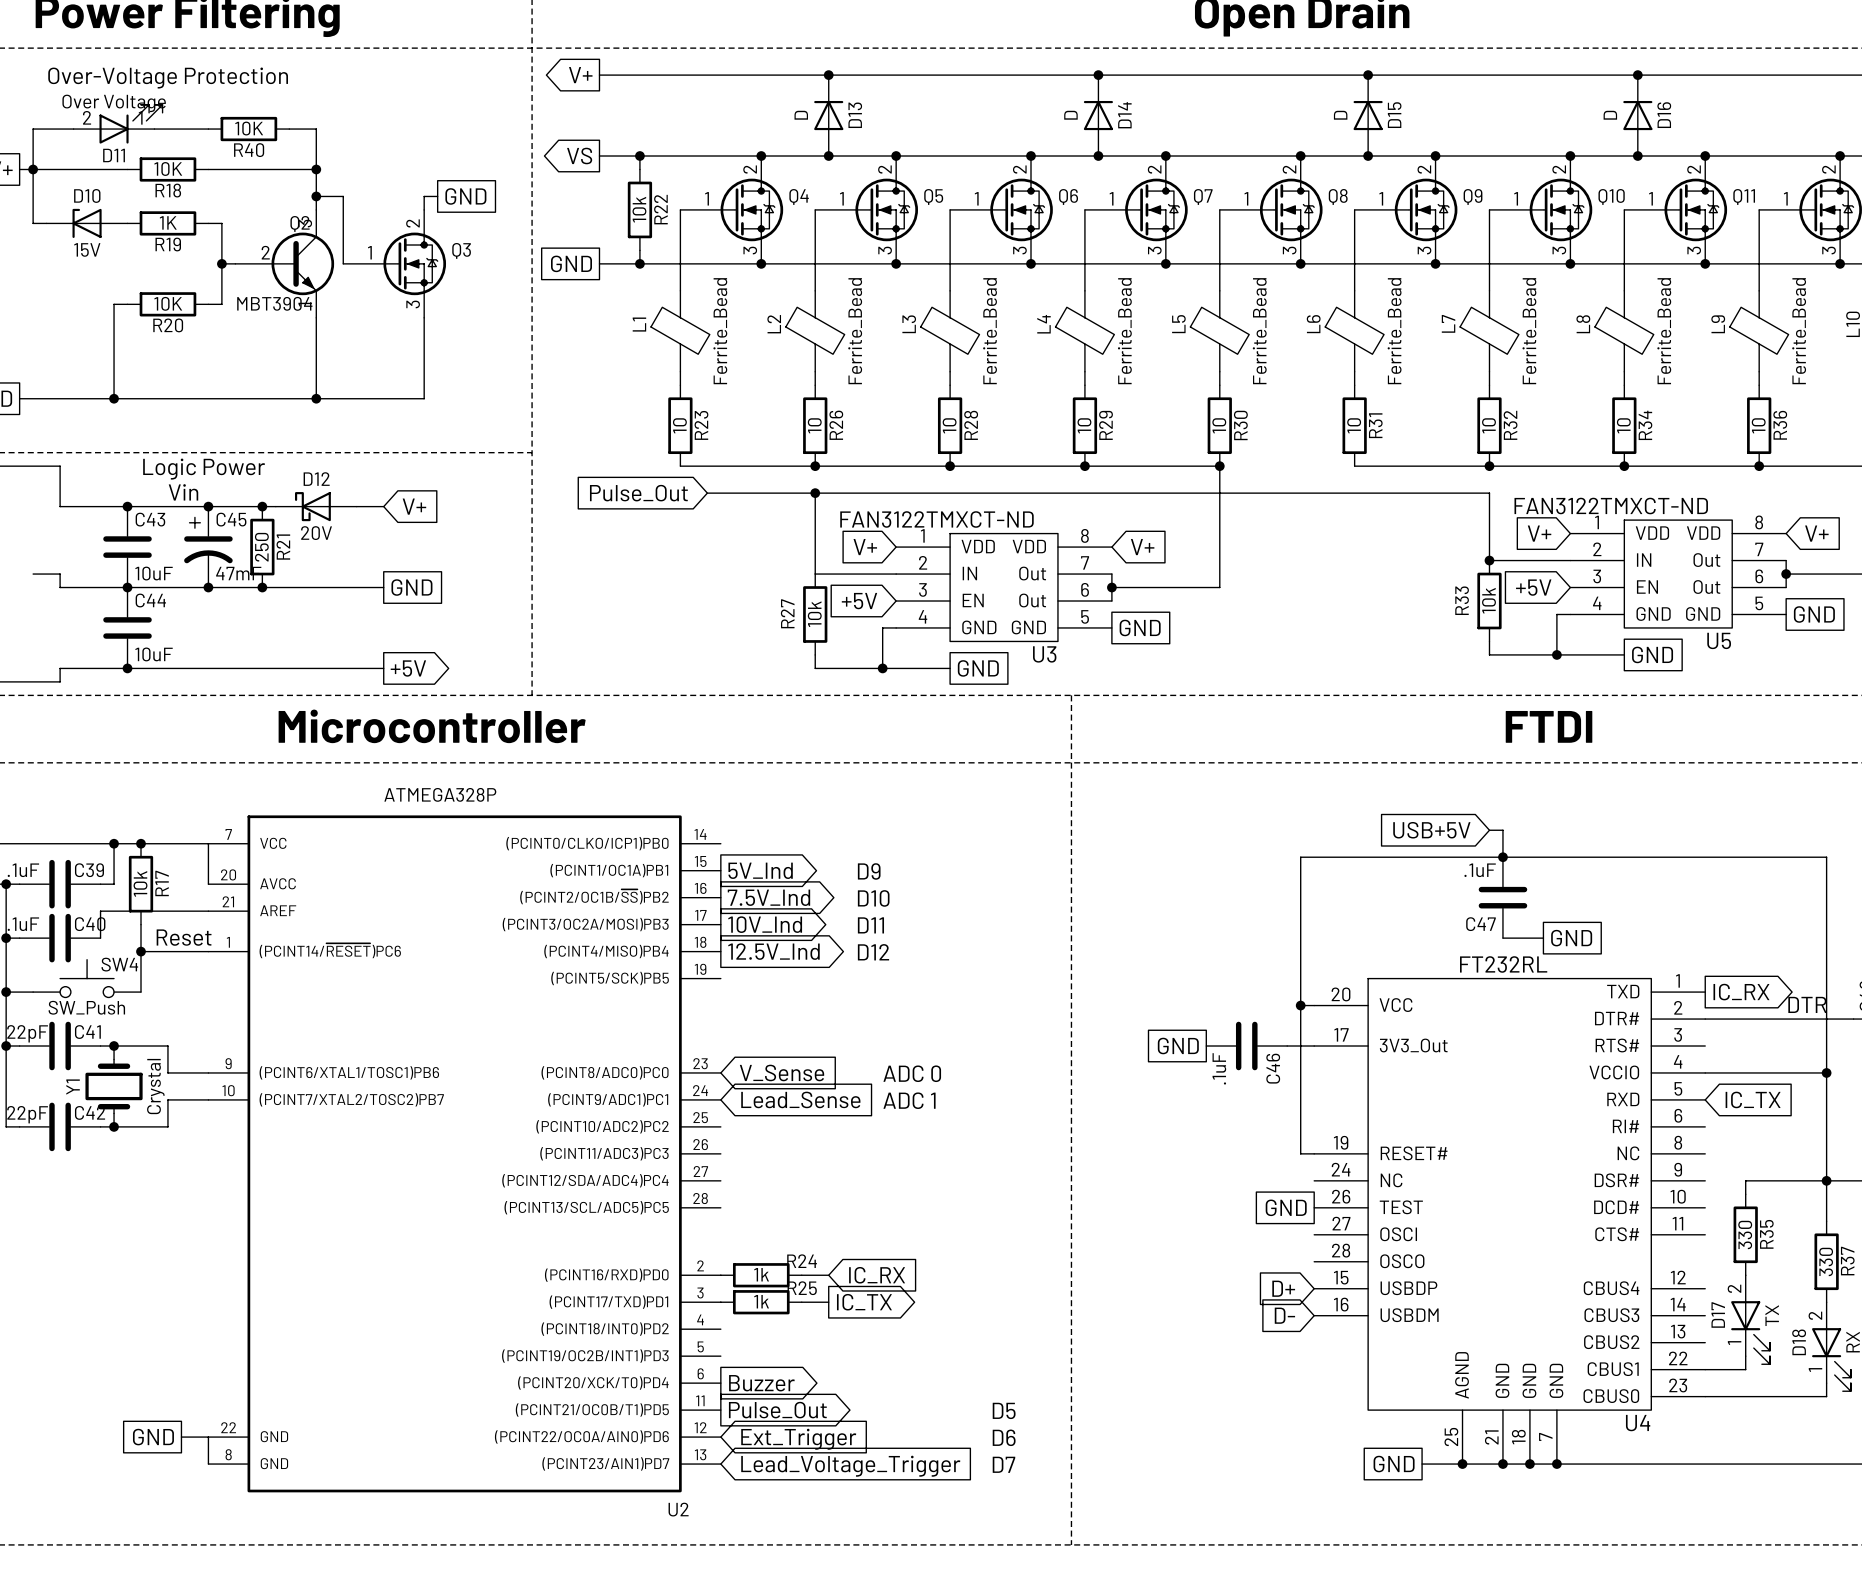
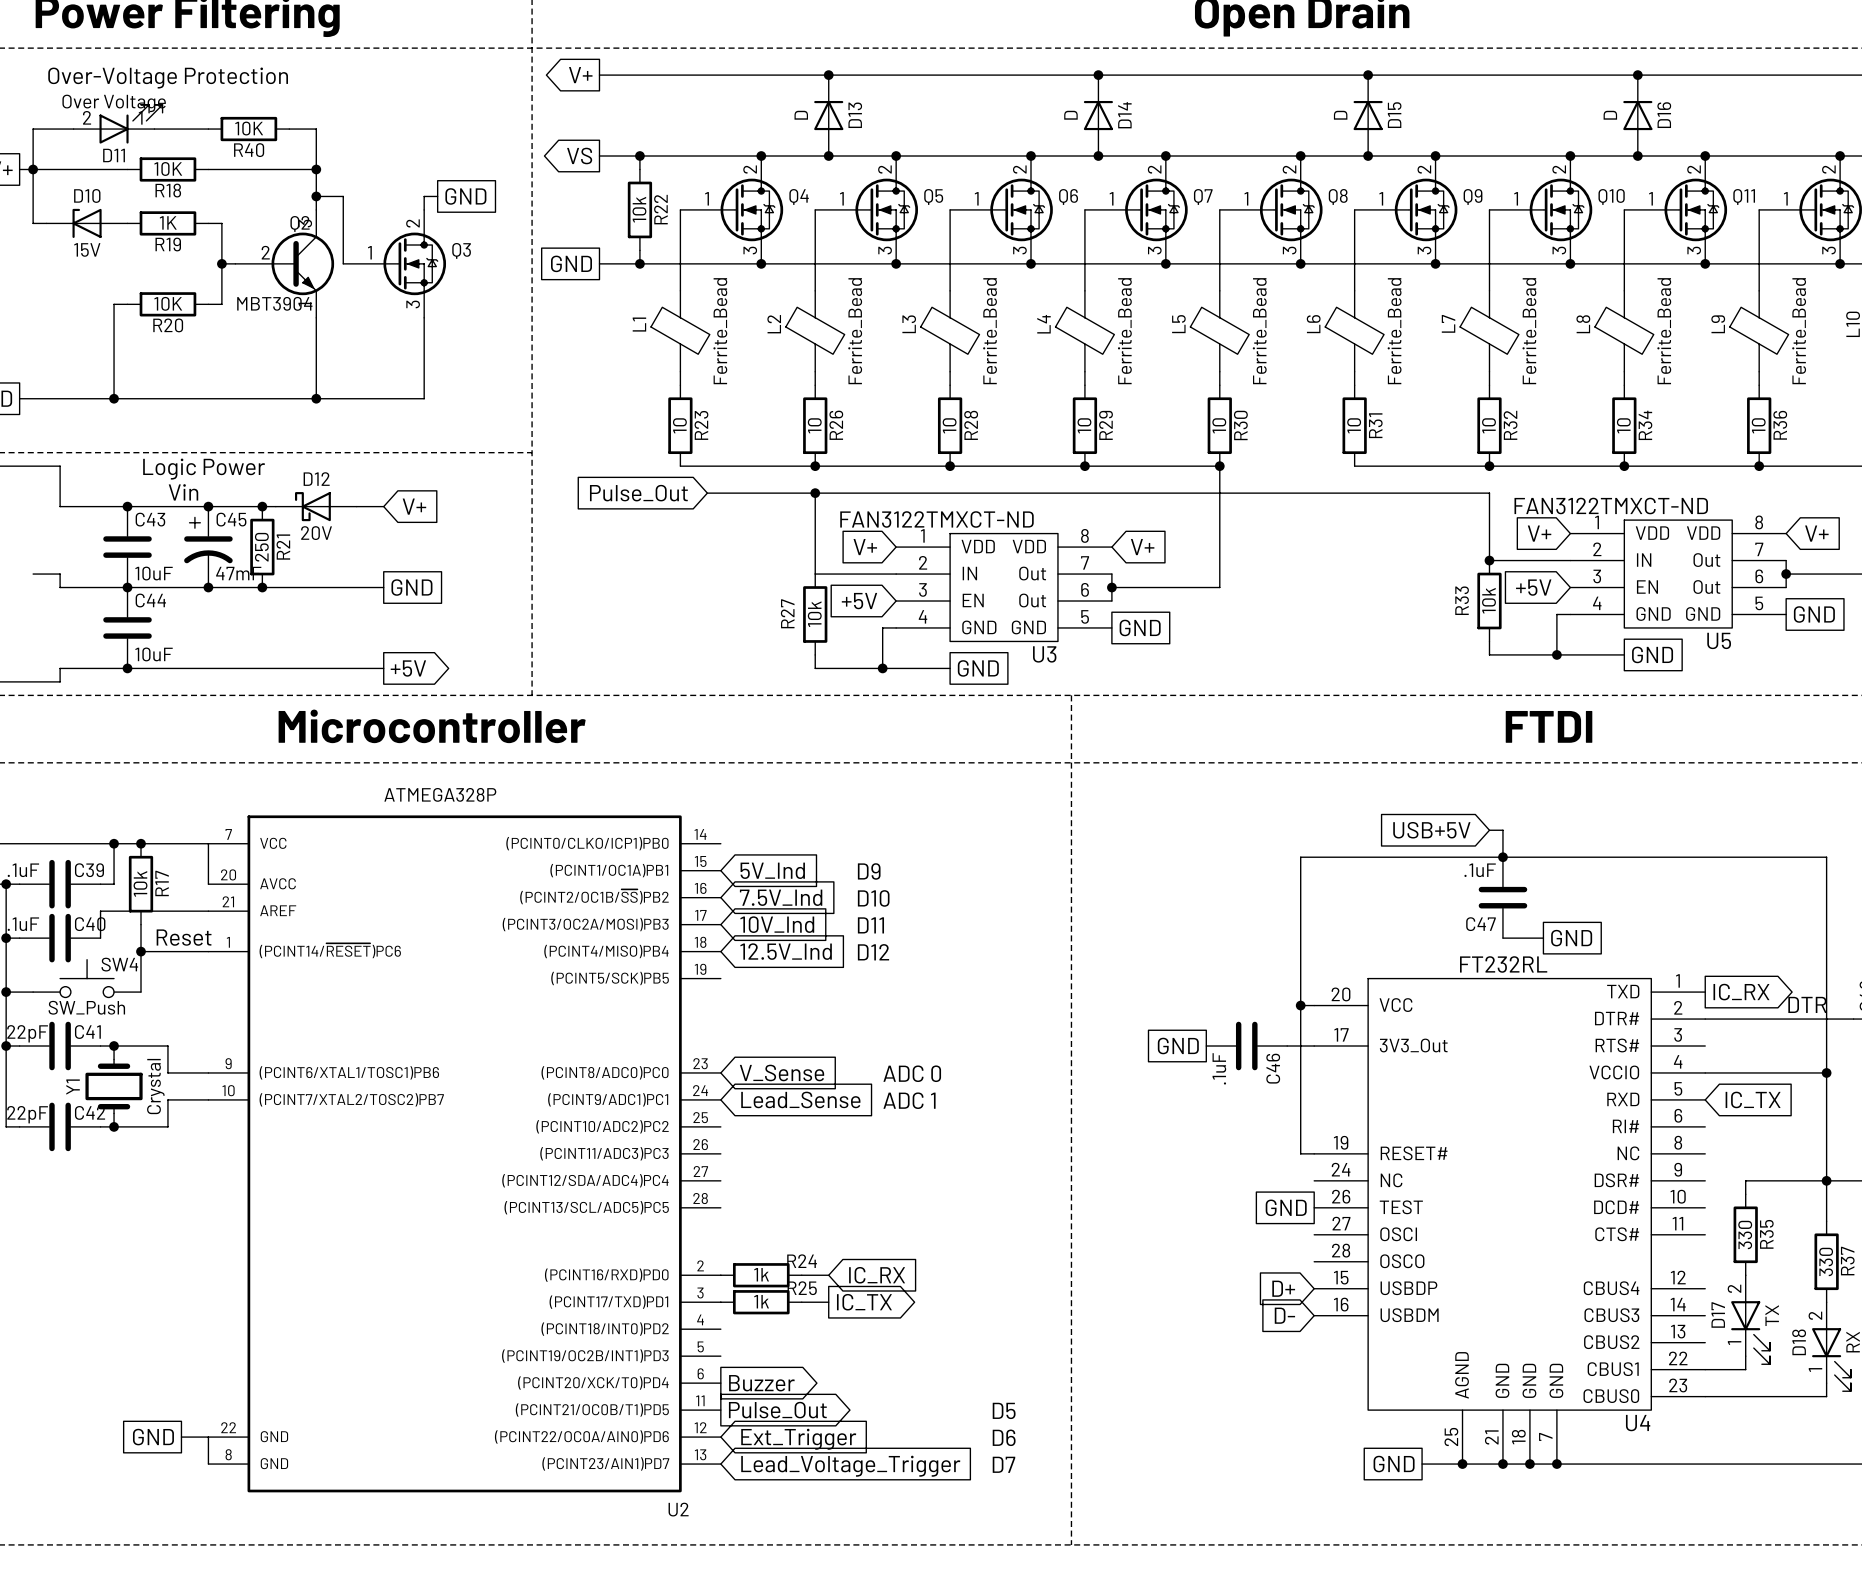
global label shape: output (760, 870) -> input (772, 870)
global label shape: output (768, 897) -> input (781, 897)
global label shape: output (765, 924) -> input (777, 924)
global label shape: output (773, 951) -> input (786, 951)

